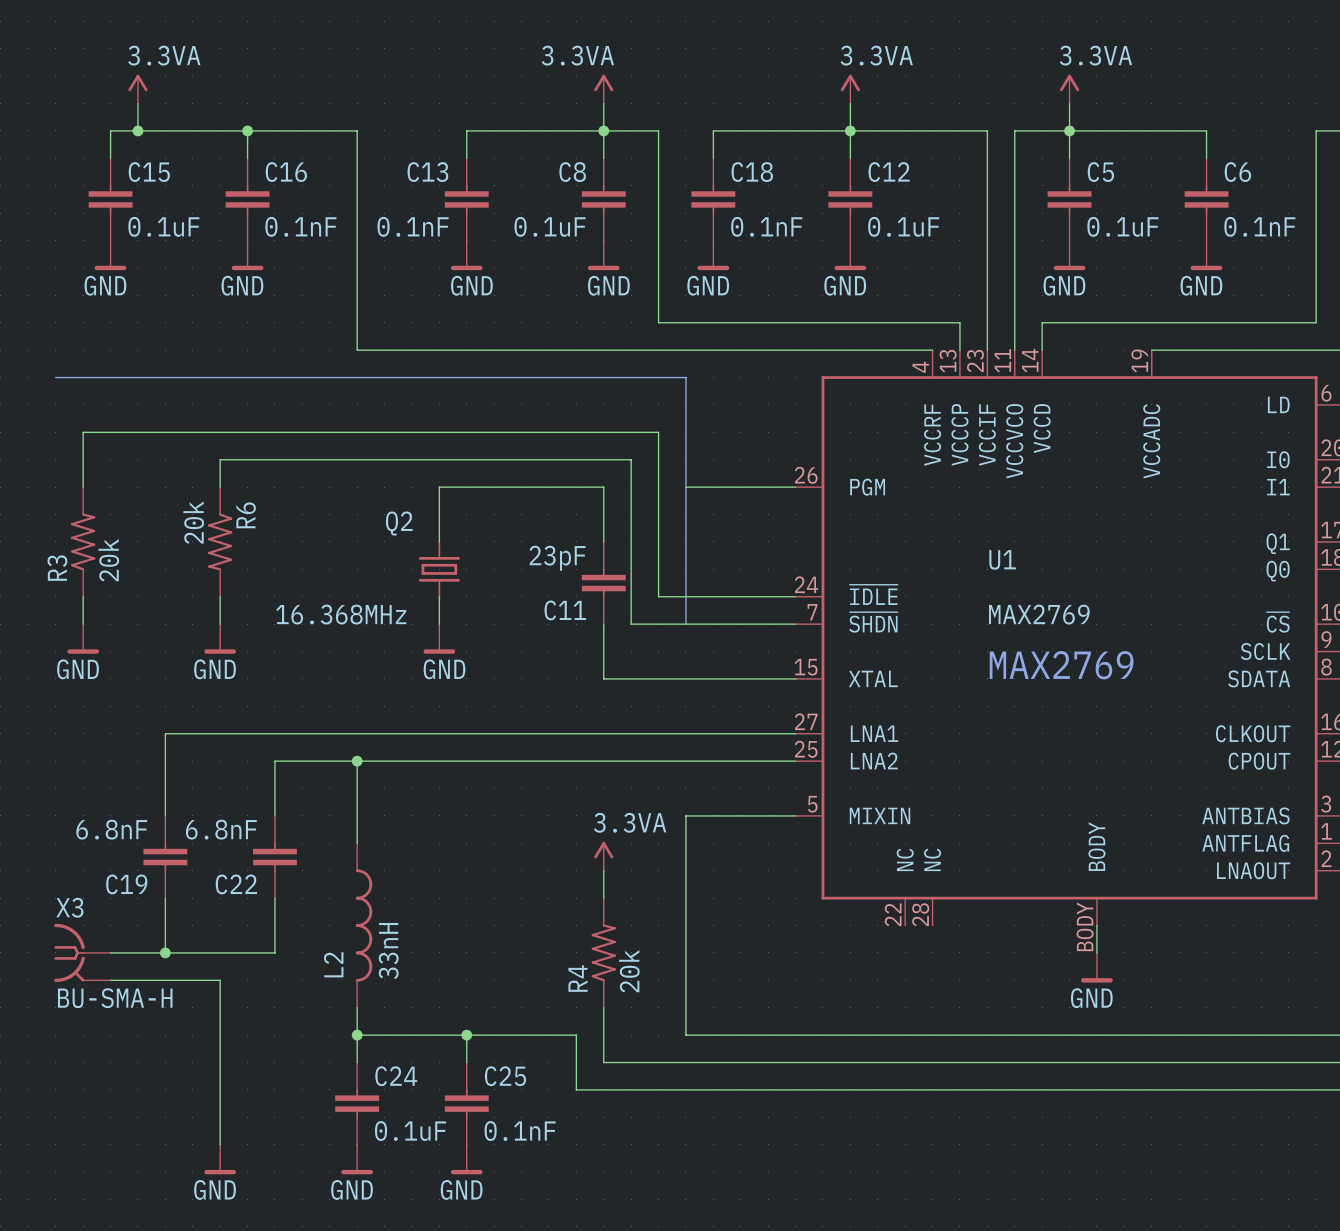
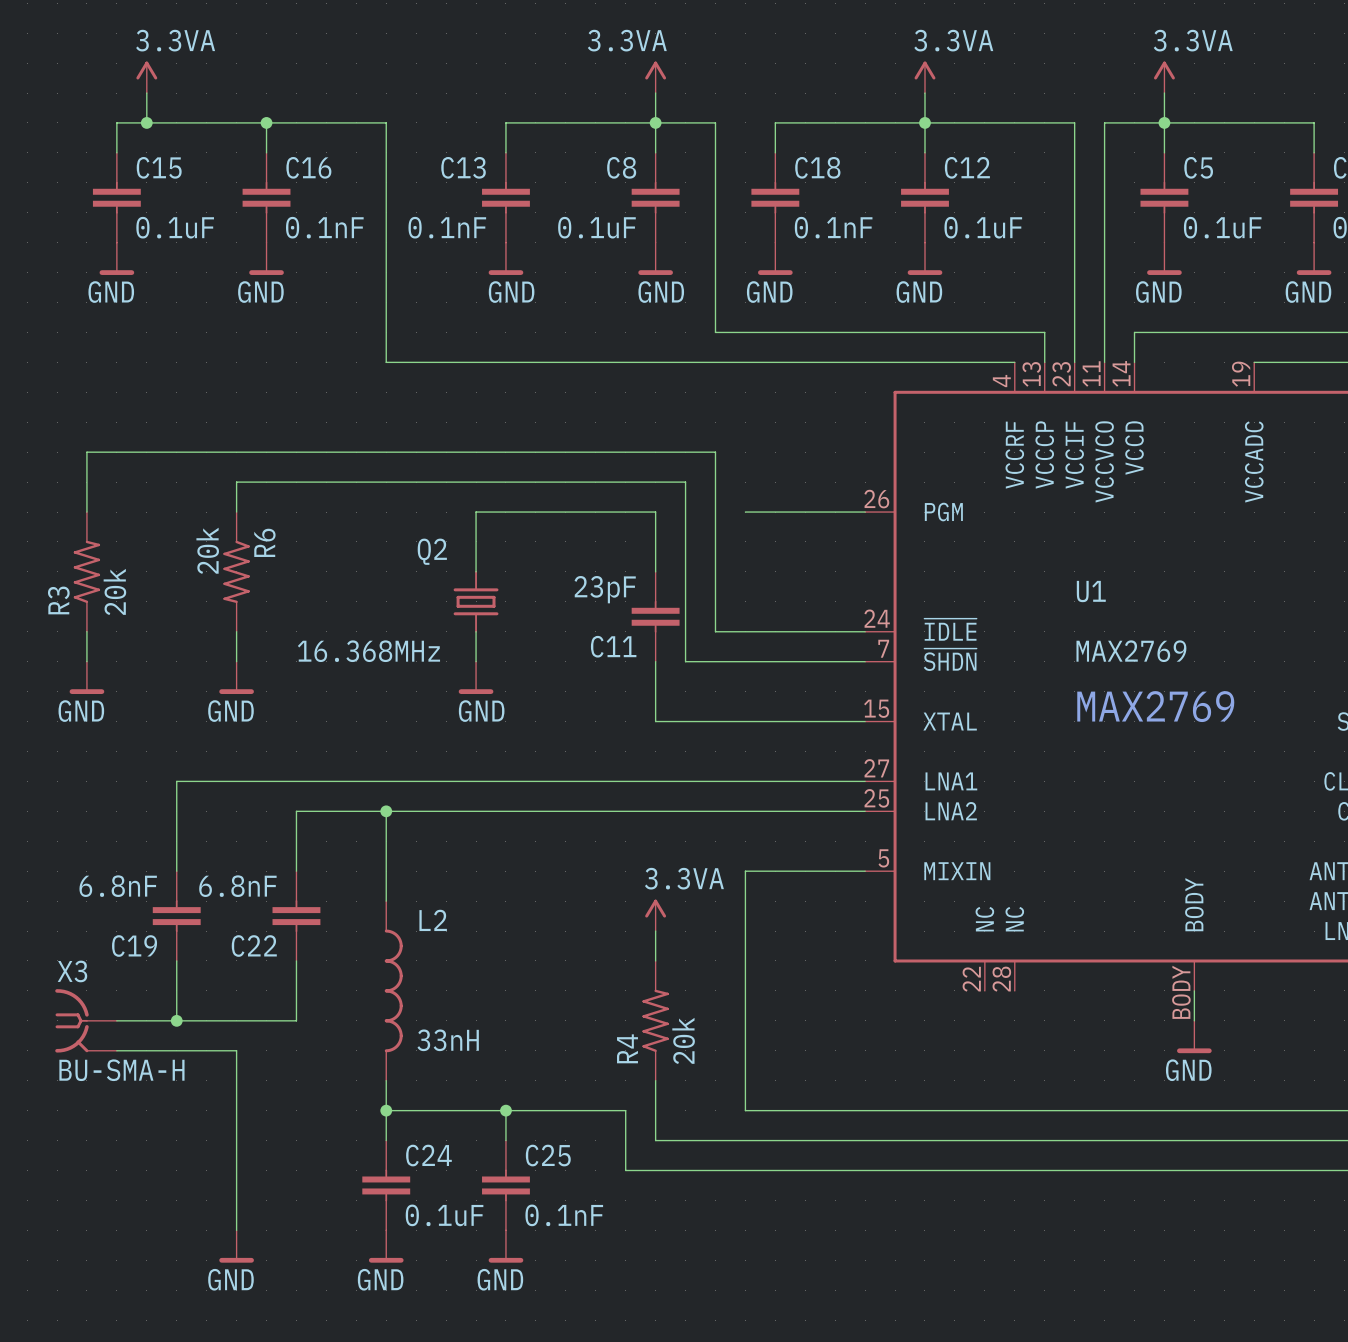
bus: (55, 377) (685, 377) (685, 624) -> none
L2 value rotation: 0° (388, 951) -> 90° clockwise (448, 1040)
L2 name rotation: 0° (333, 964) -> 90° clockwise (433, 920)
L2 name position: L2 (333, 964) -> L2 (433, 920)

